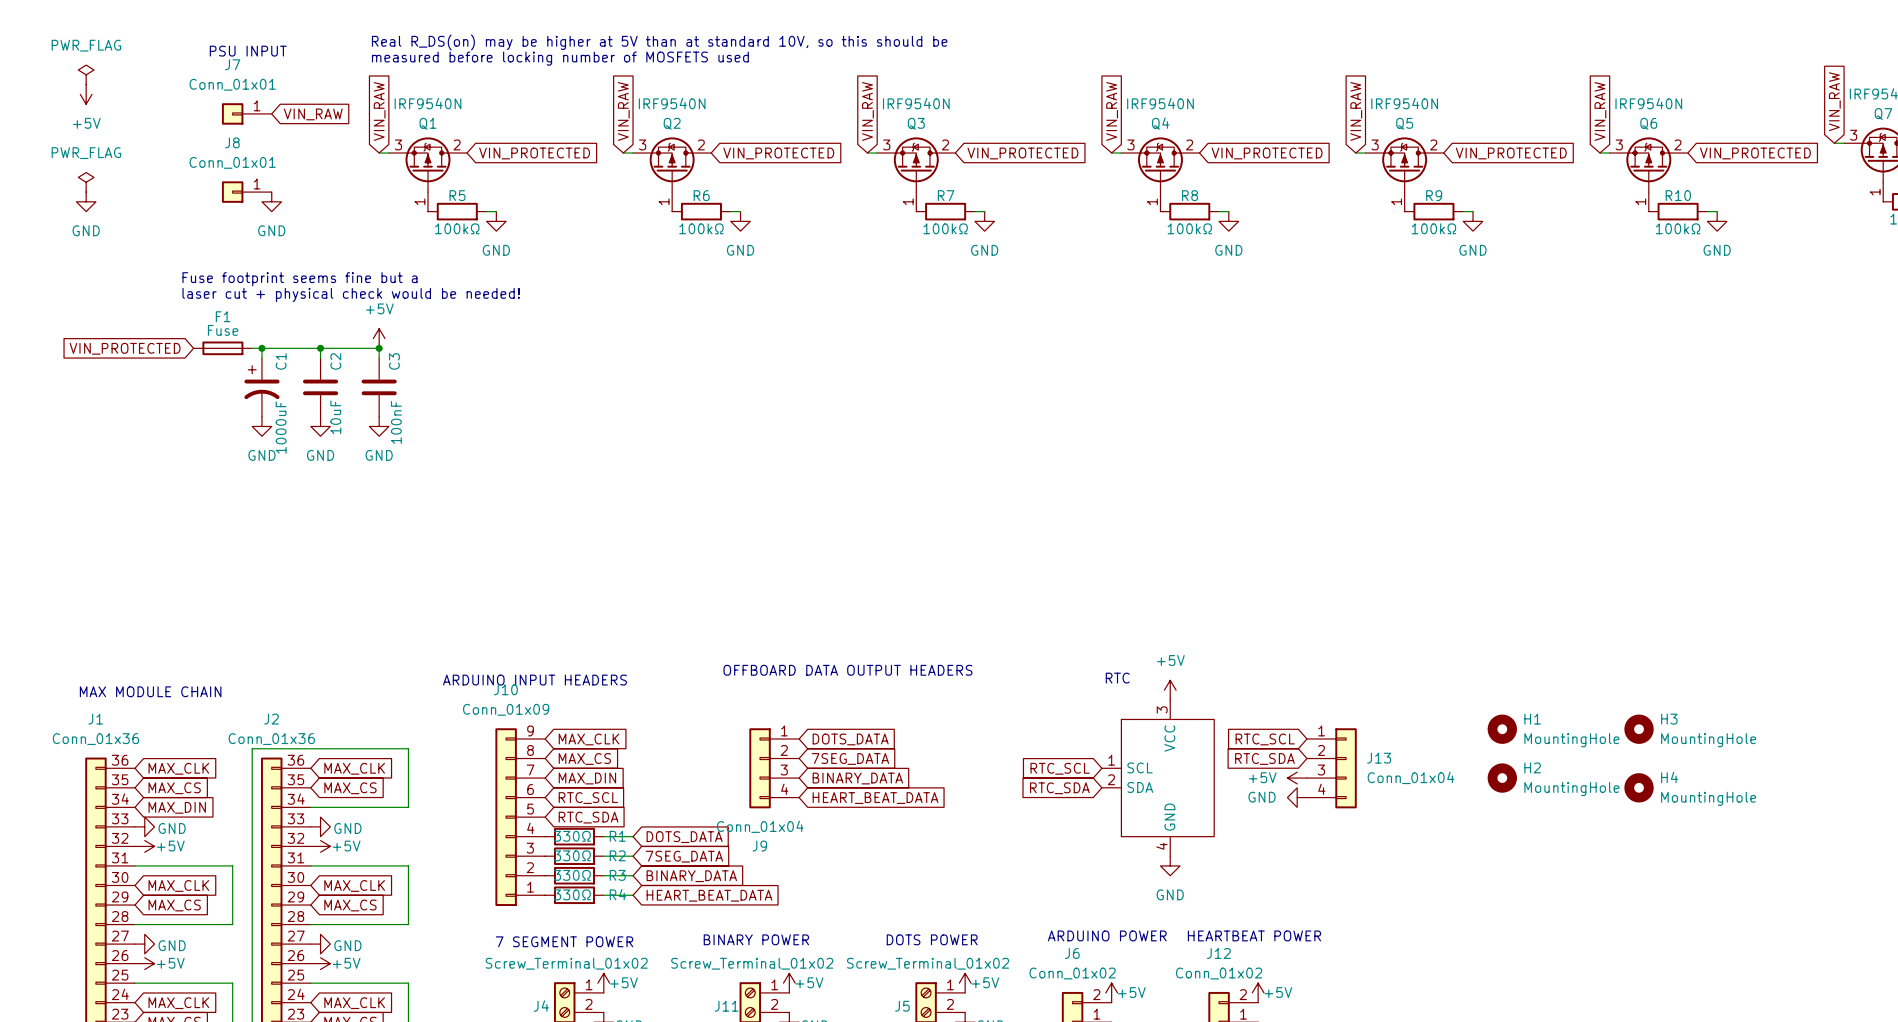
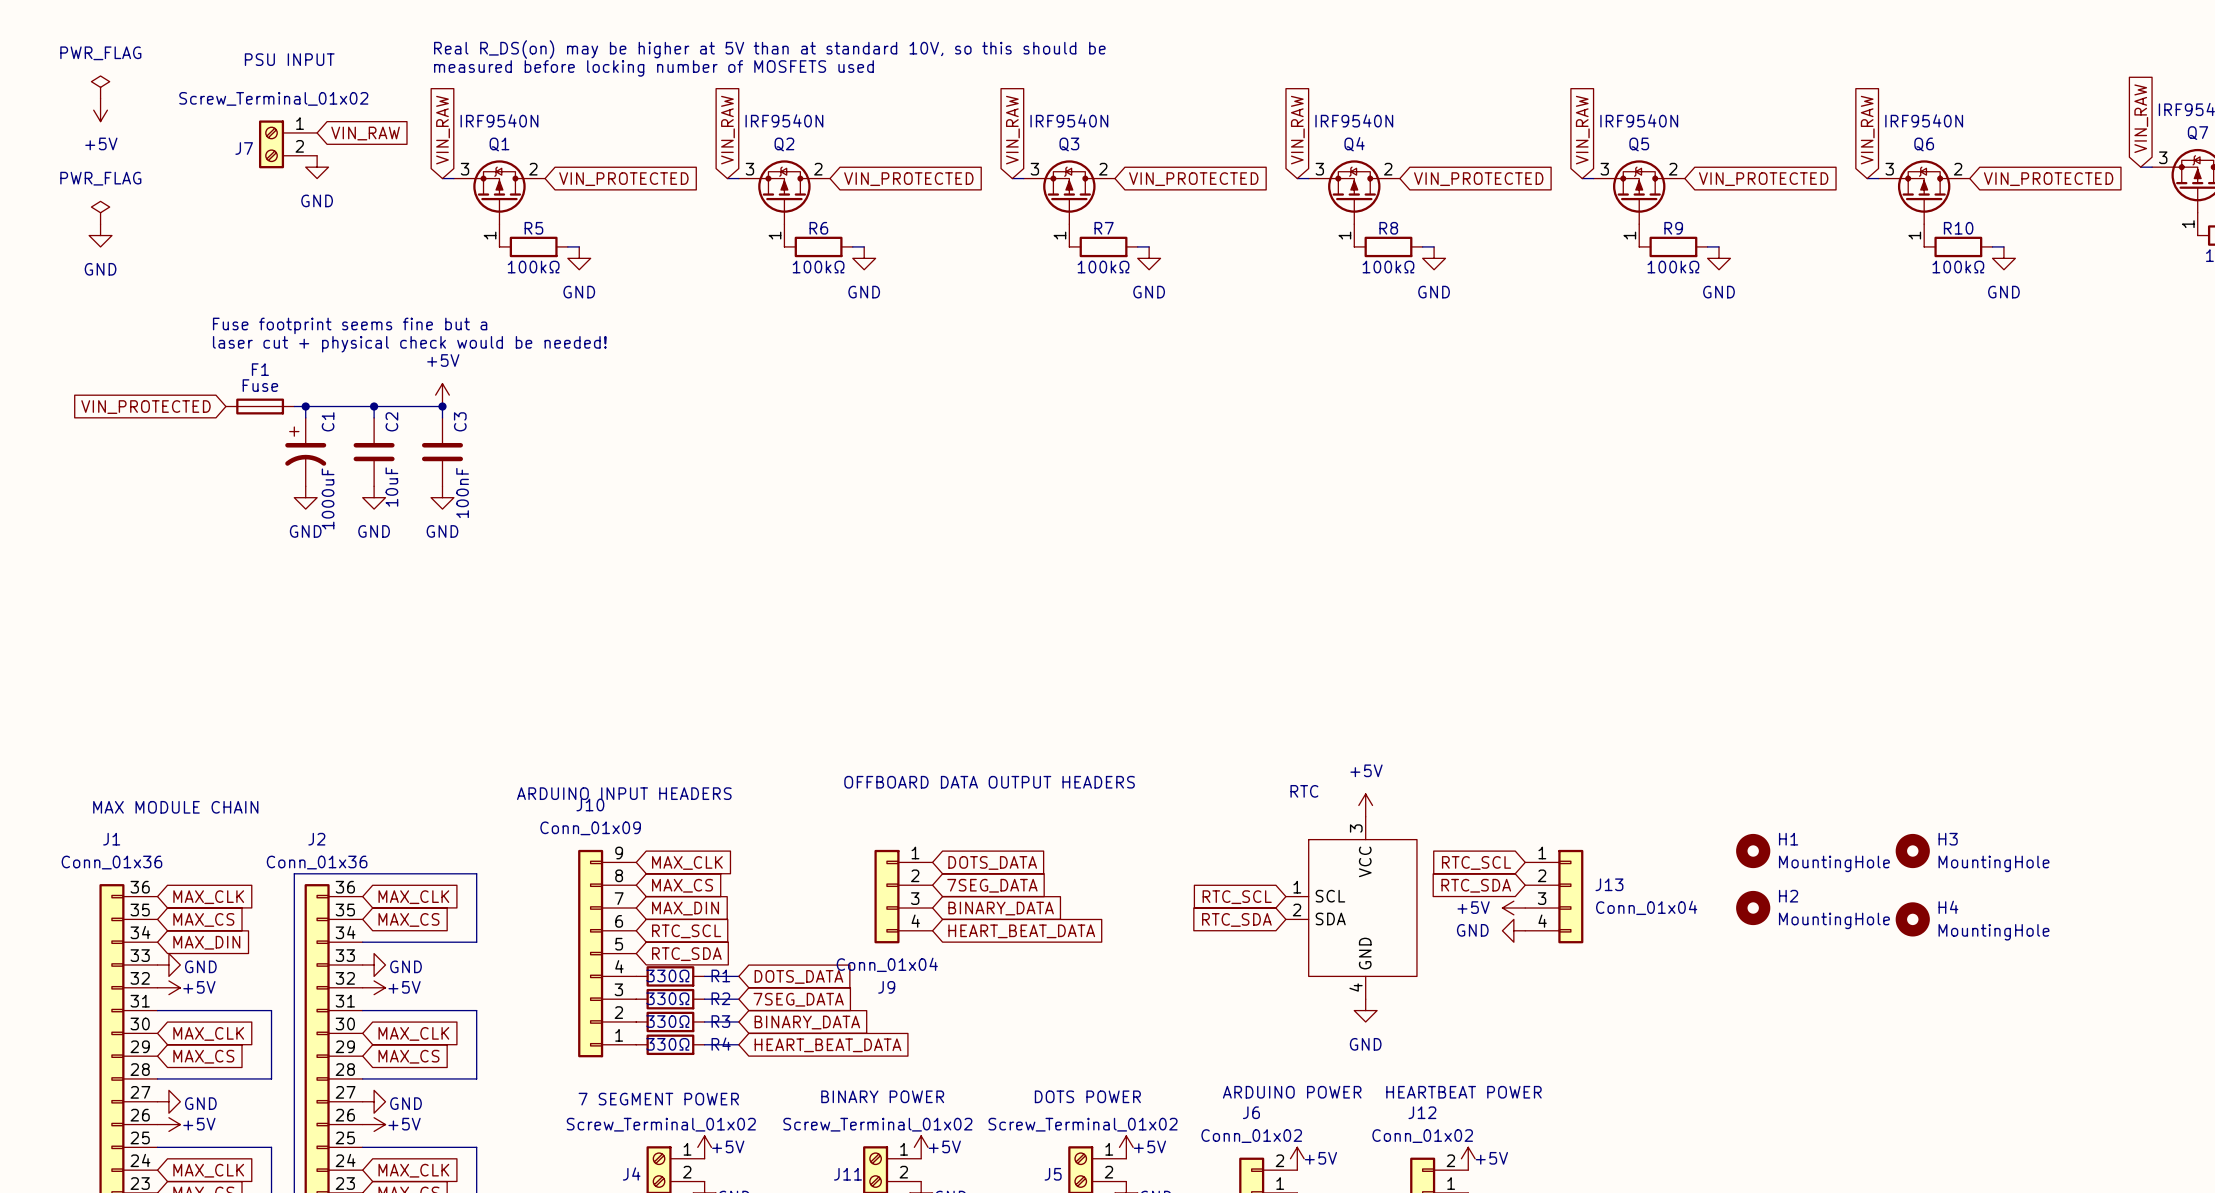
J7 name position: J7 (232, 64) -> J7 (244, 148)
J7 value: Conn_01x01 (232, 84) -> Screw_Terminal_01x02 (273, 98)
J7 symbol: [221, 103, 272, 125] -> [258, 120, 318, 169]
J8: Conn_01x01 (246, 192) -> none
power symbol position: GND (271, 201) -> GND (317, 167)

